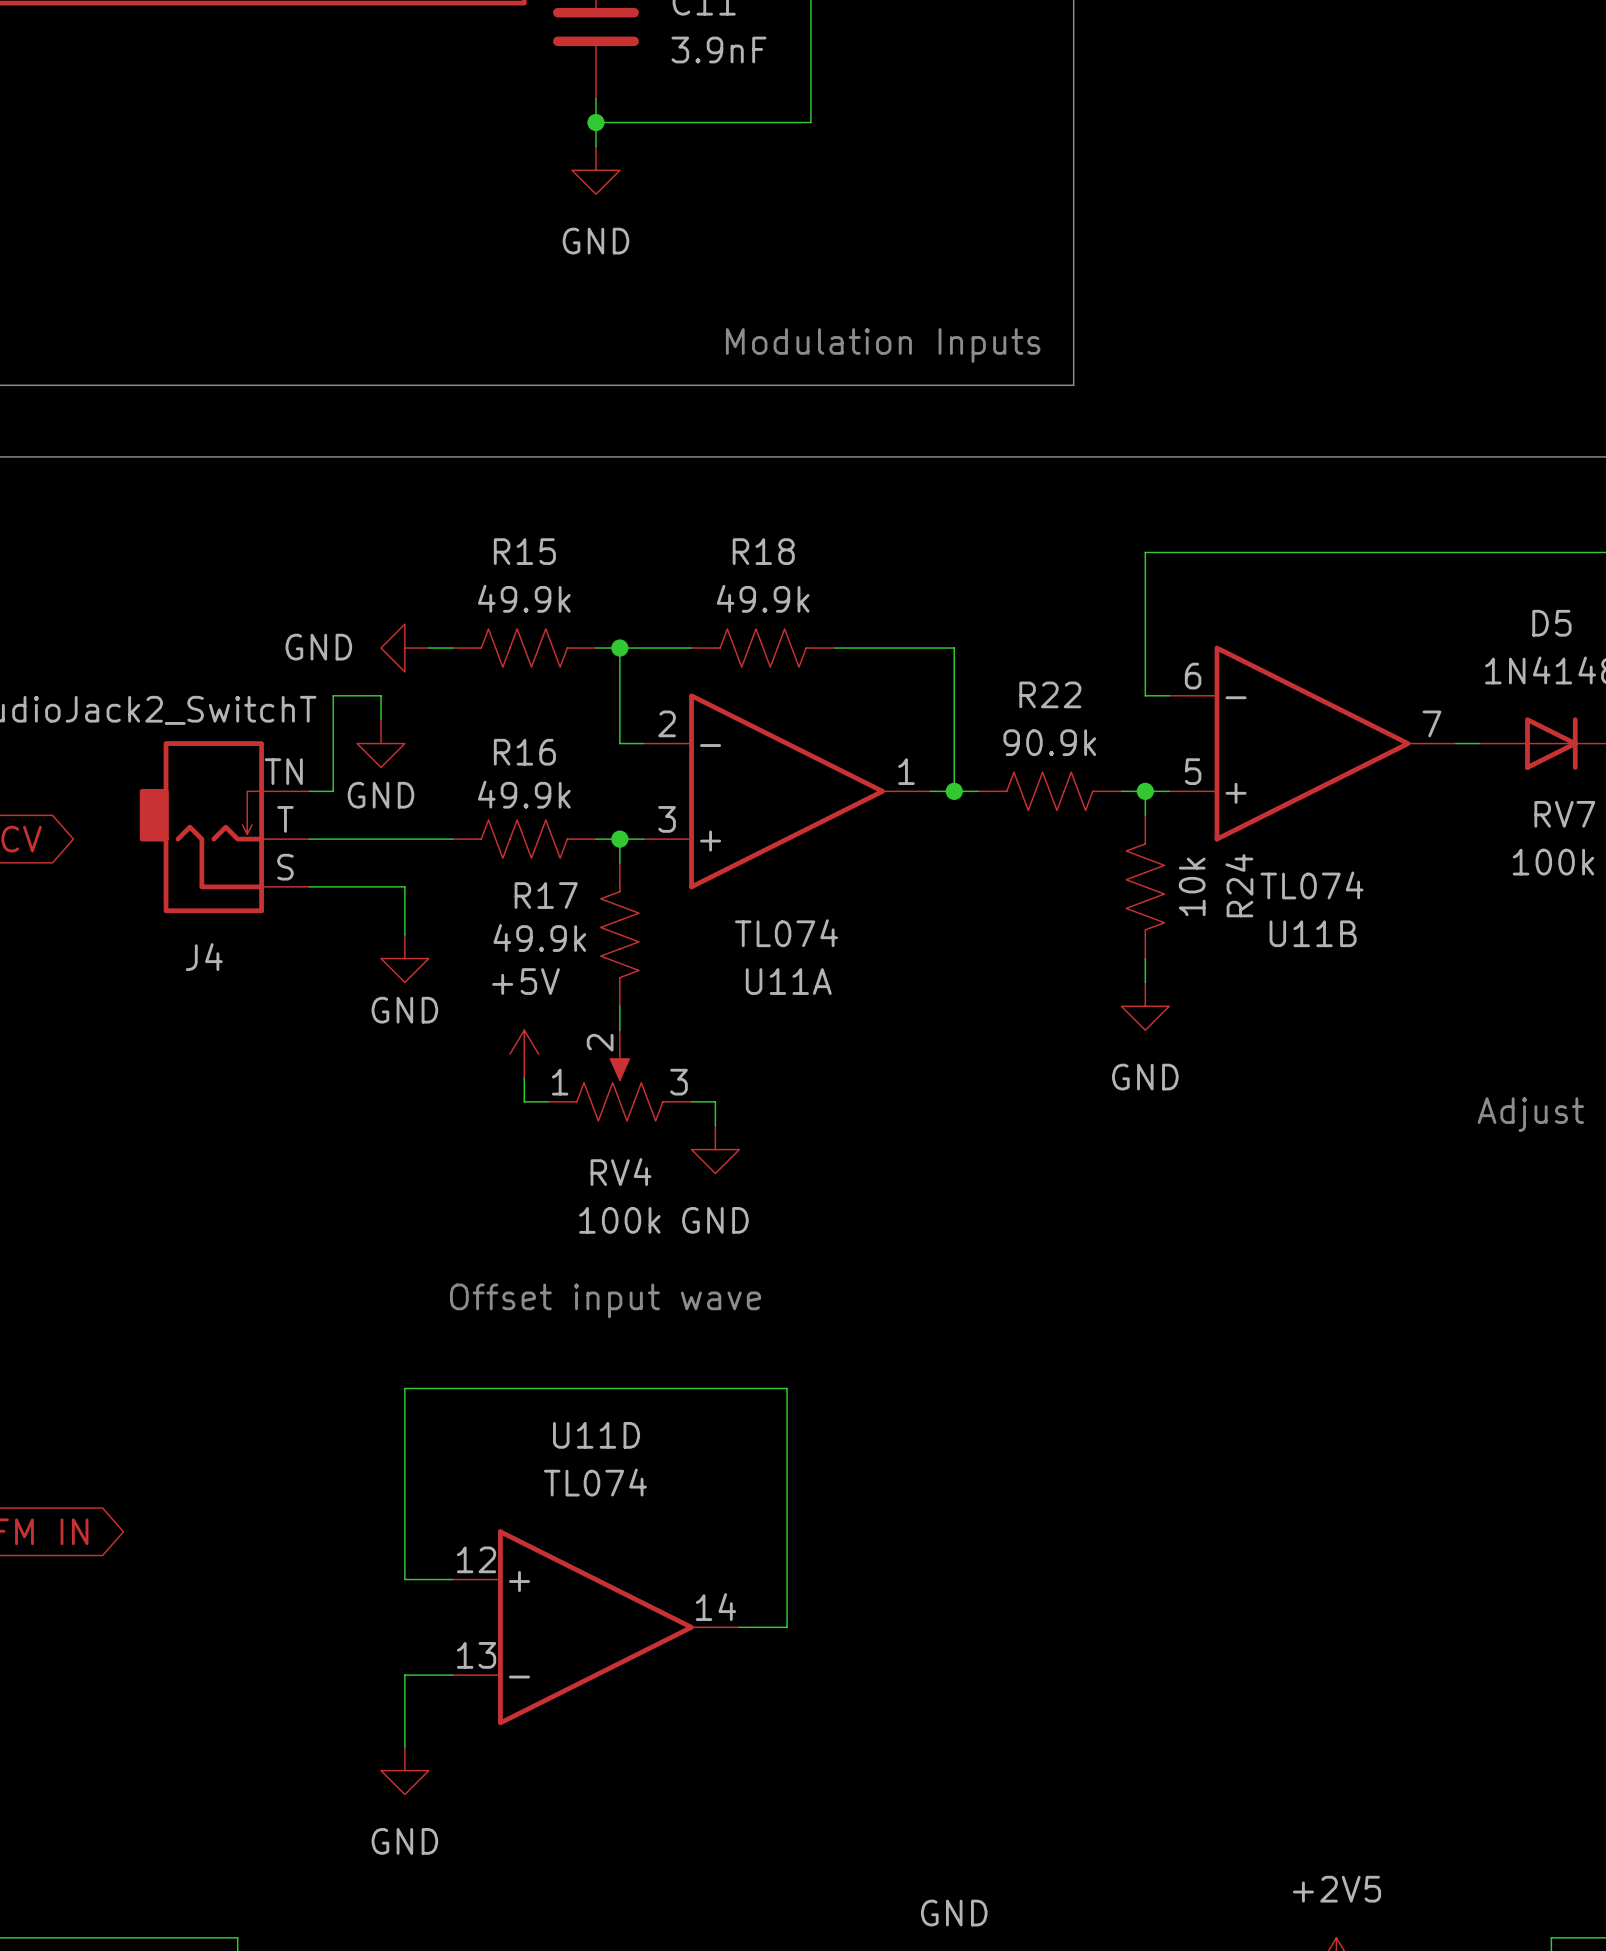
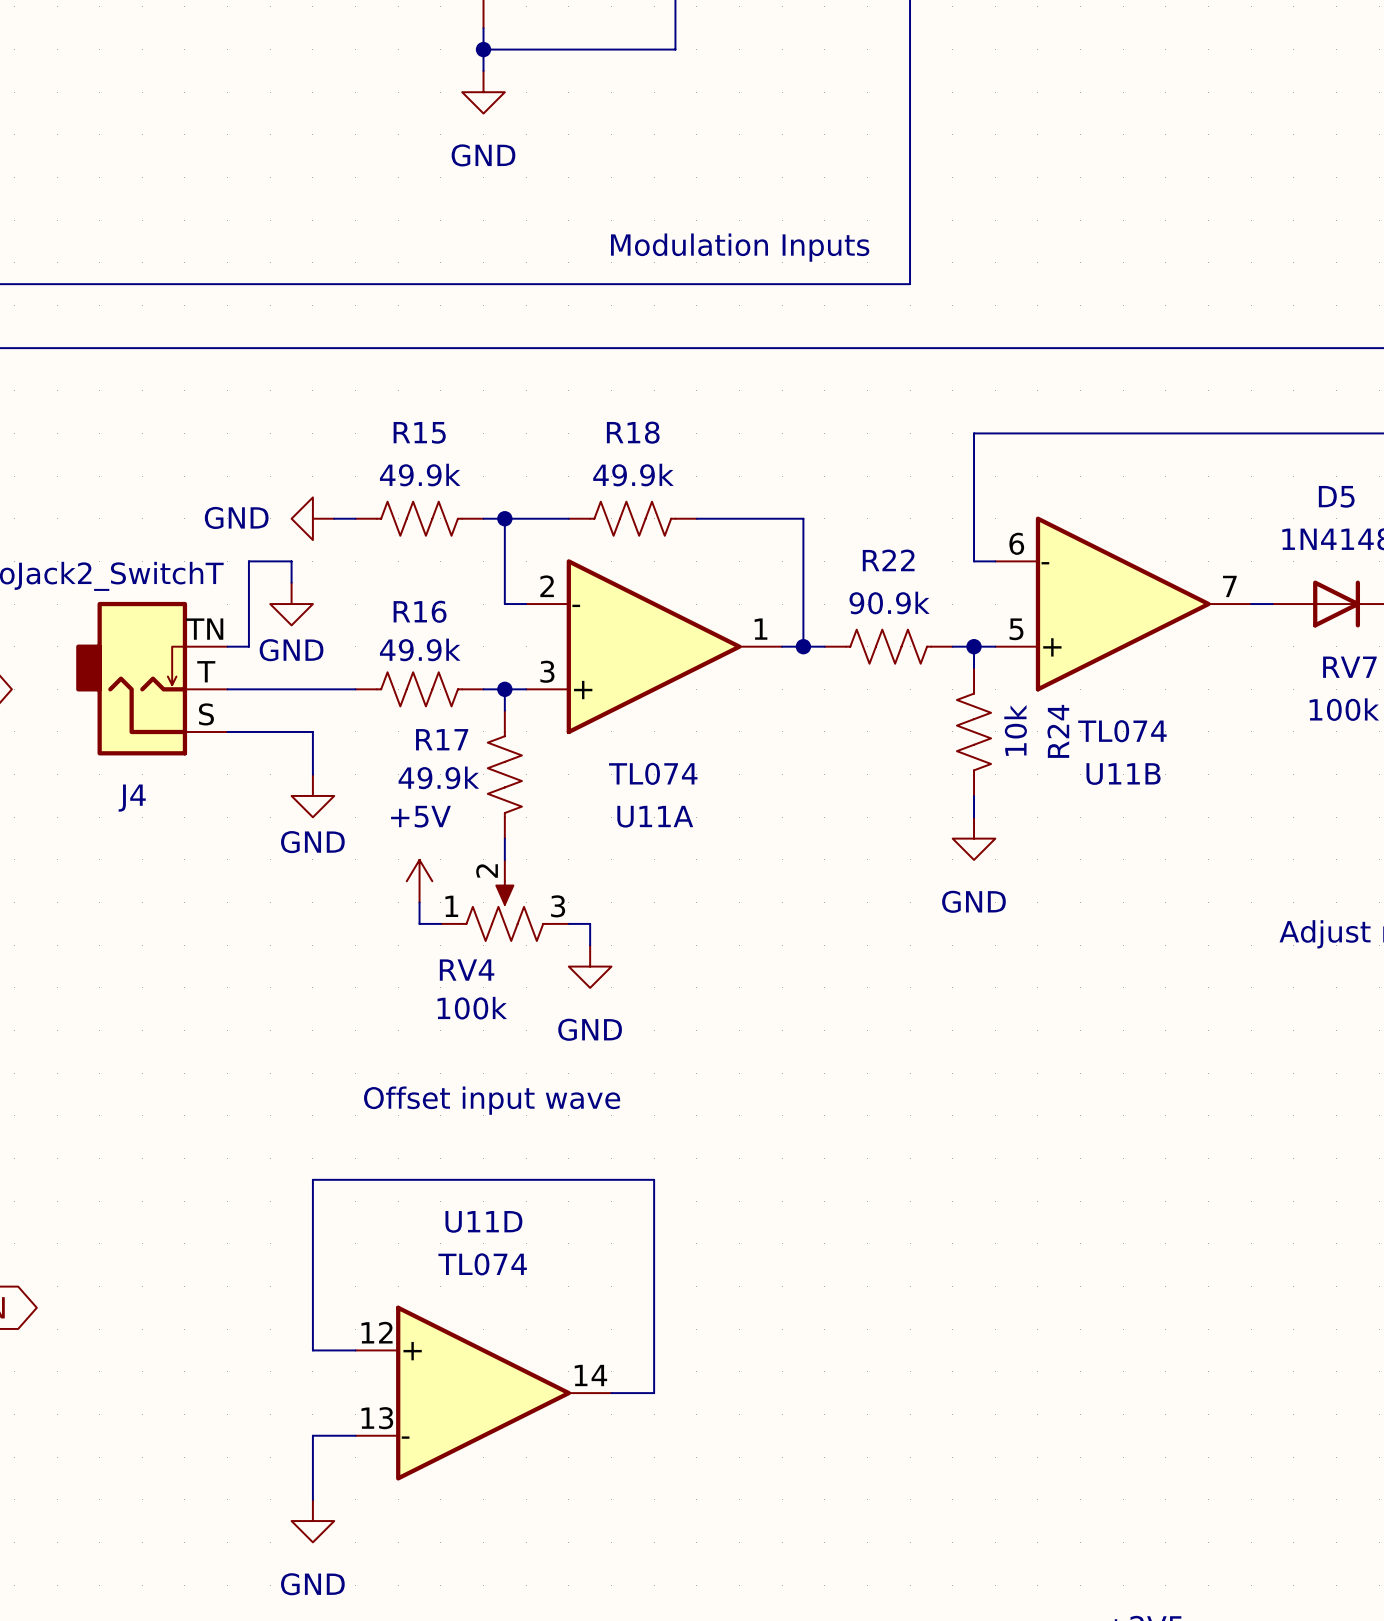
RV4 name position: RV4 (620, 1172) -> RV4 (467, 970)
RV4 value position: 100k (619, 1220) -> 100k (472, 1008)

